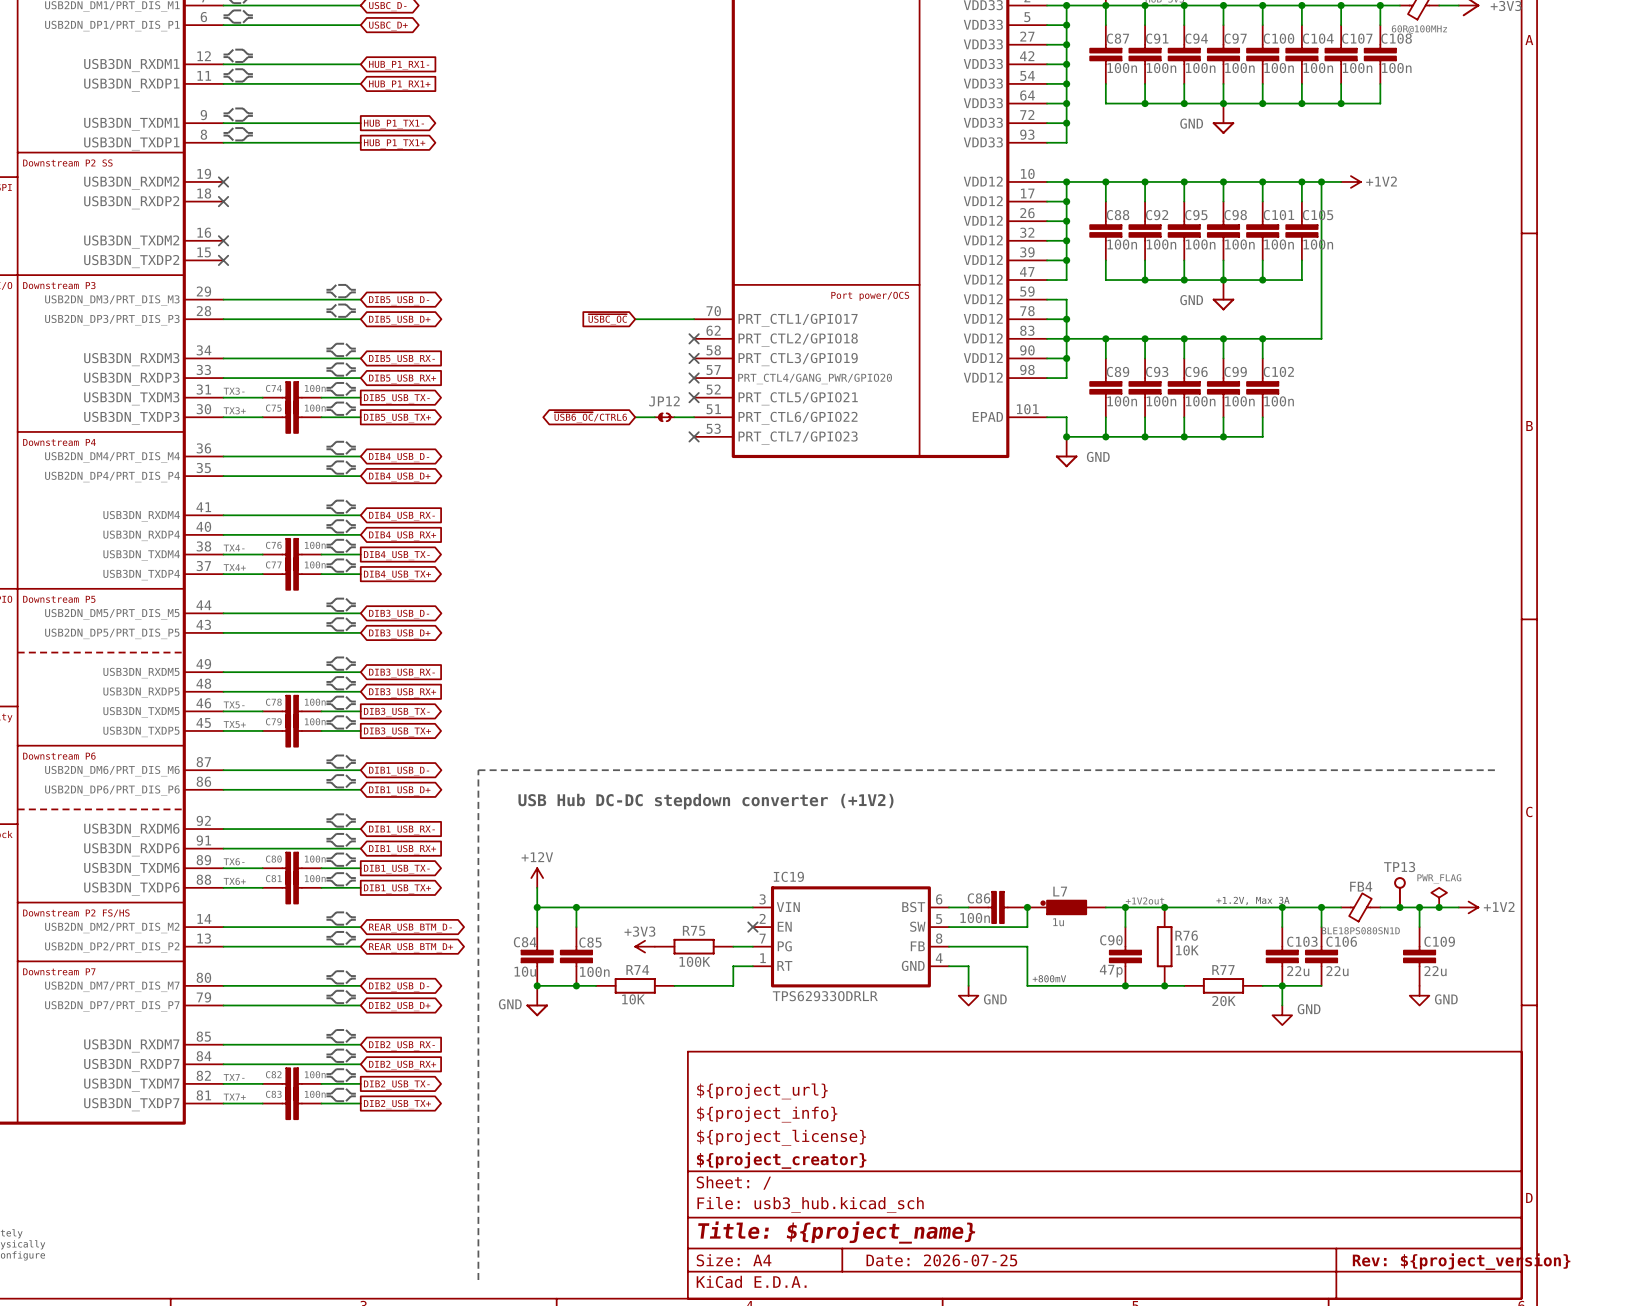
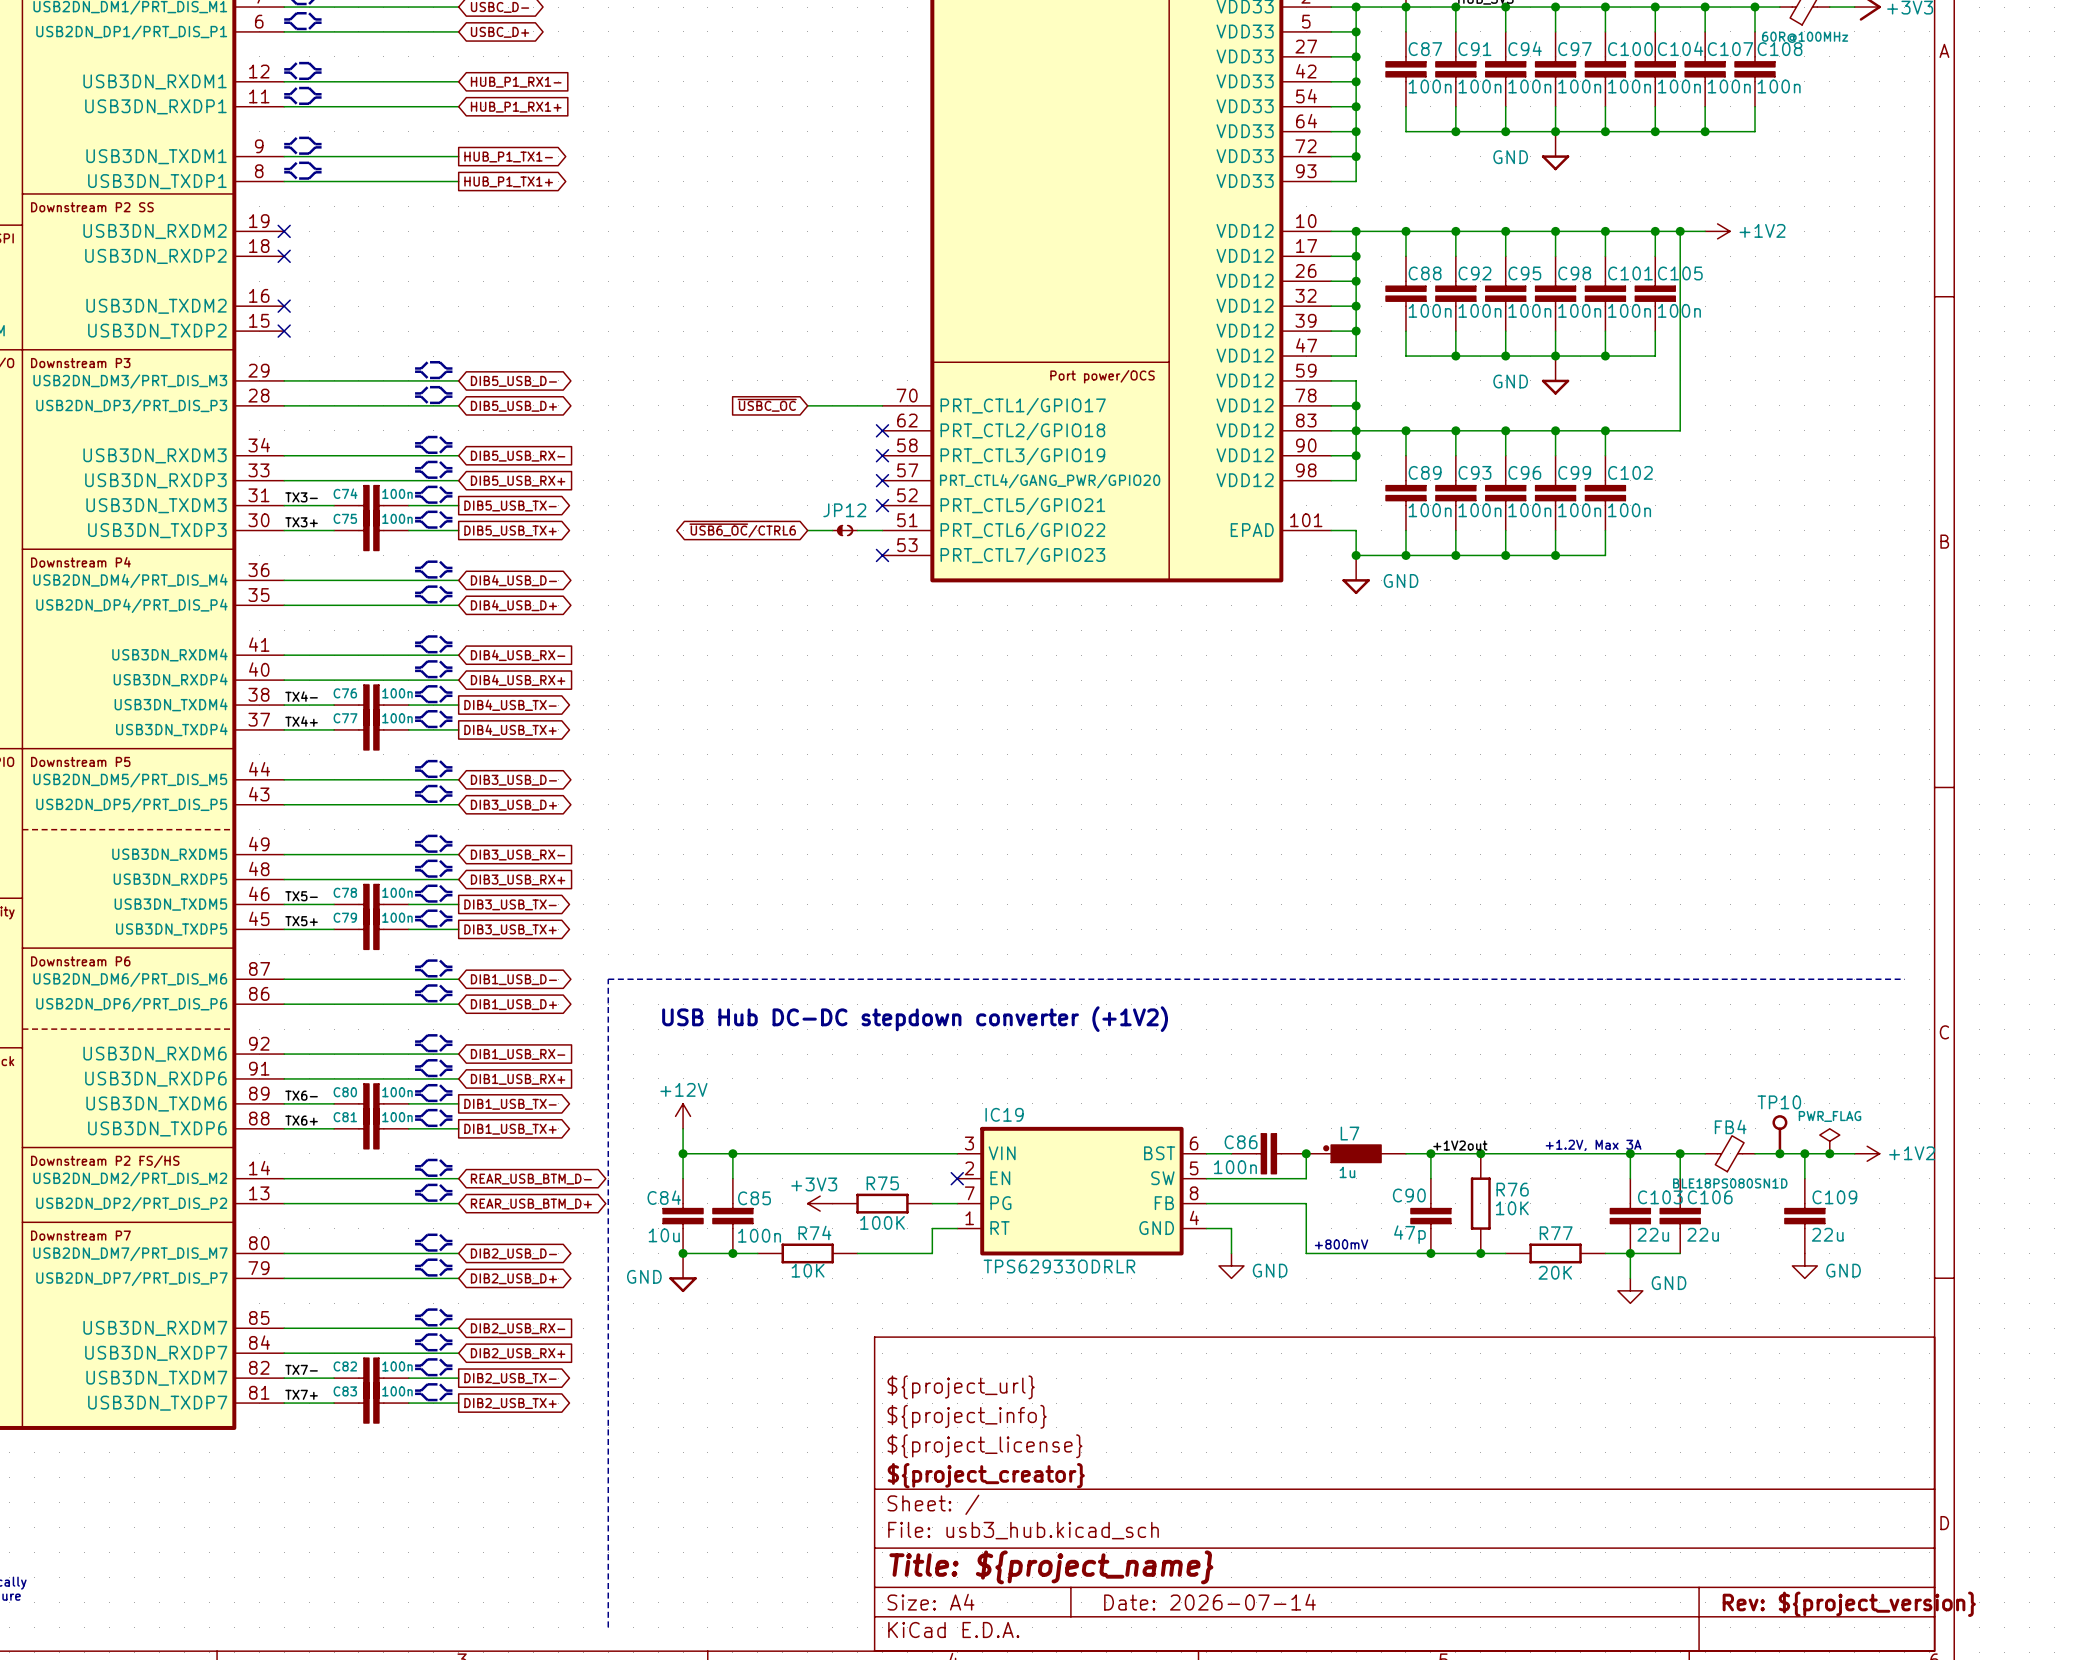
TP13 name: TP13 (1399, 867) -> TP10 (1779, 1102)
title block: Date: 2026-07-25 (941, 1260) -> Date: 2026-07-14 (1210, 1602)

